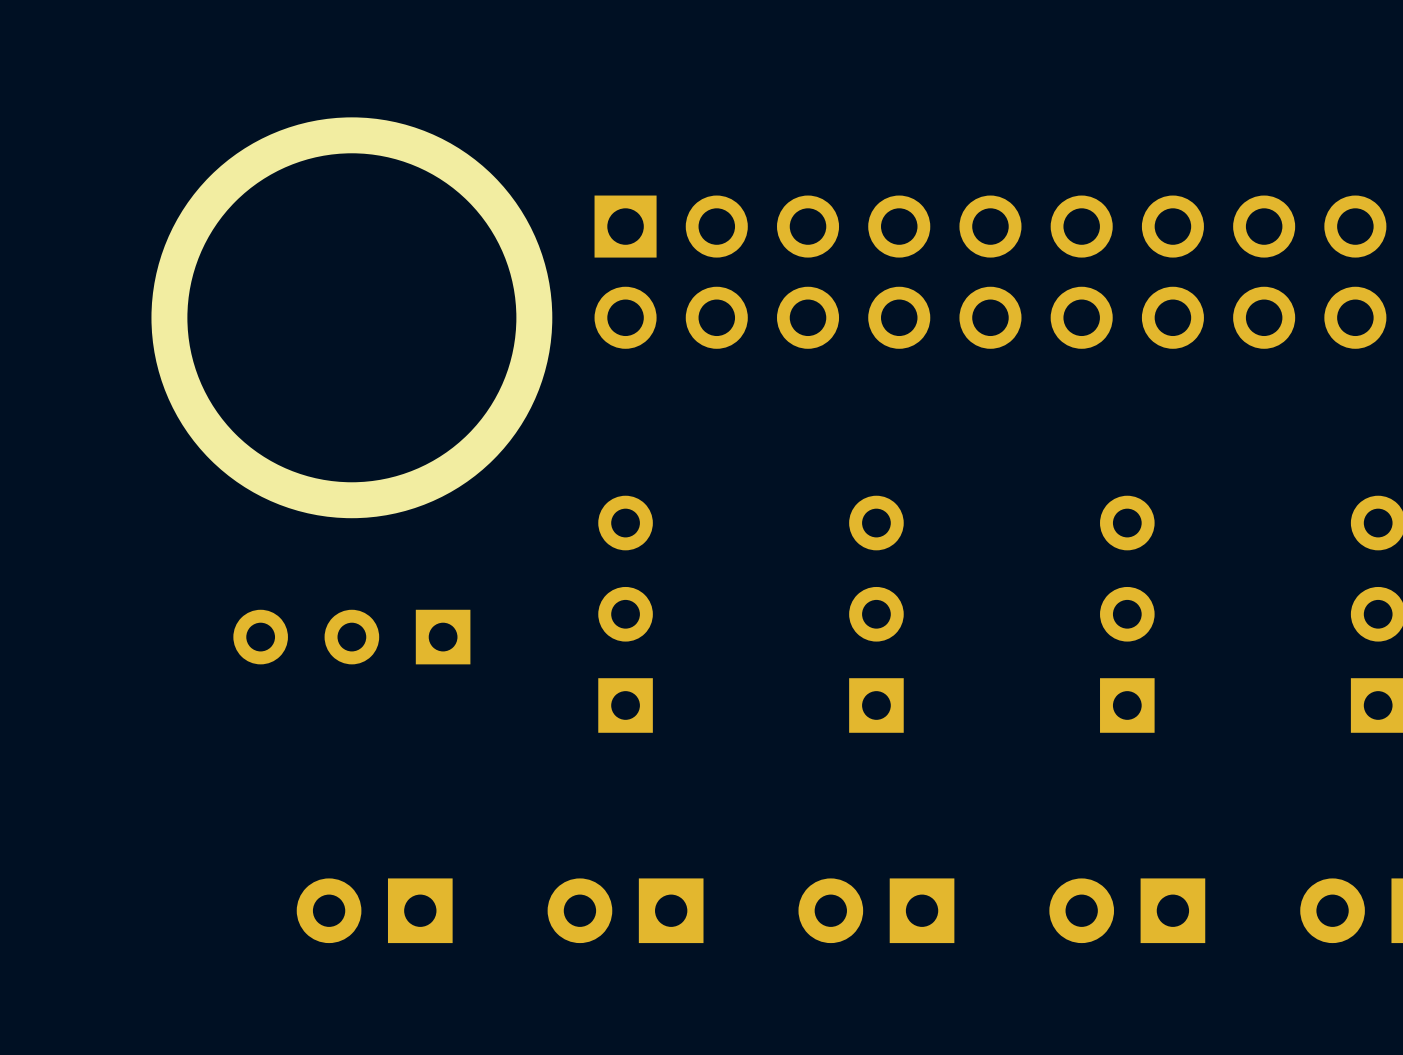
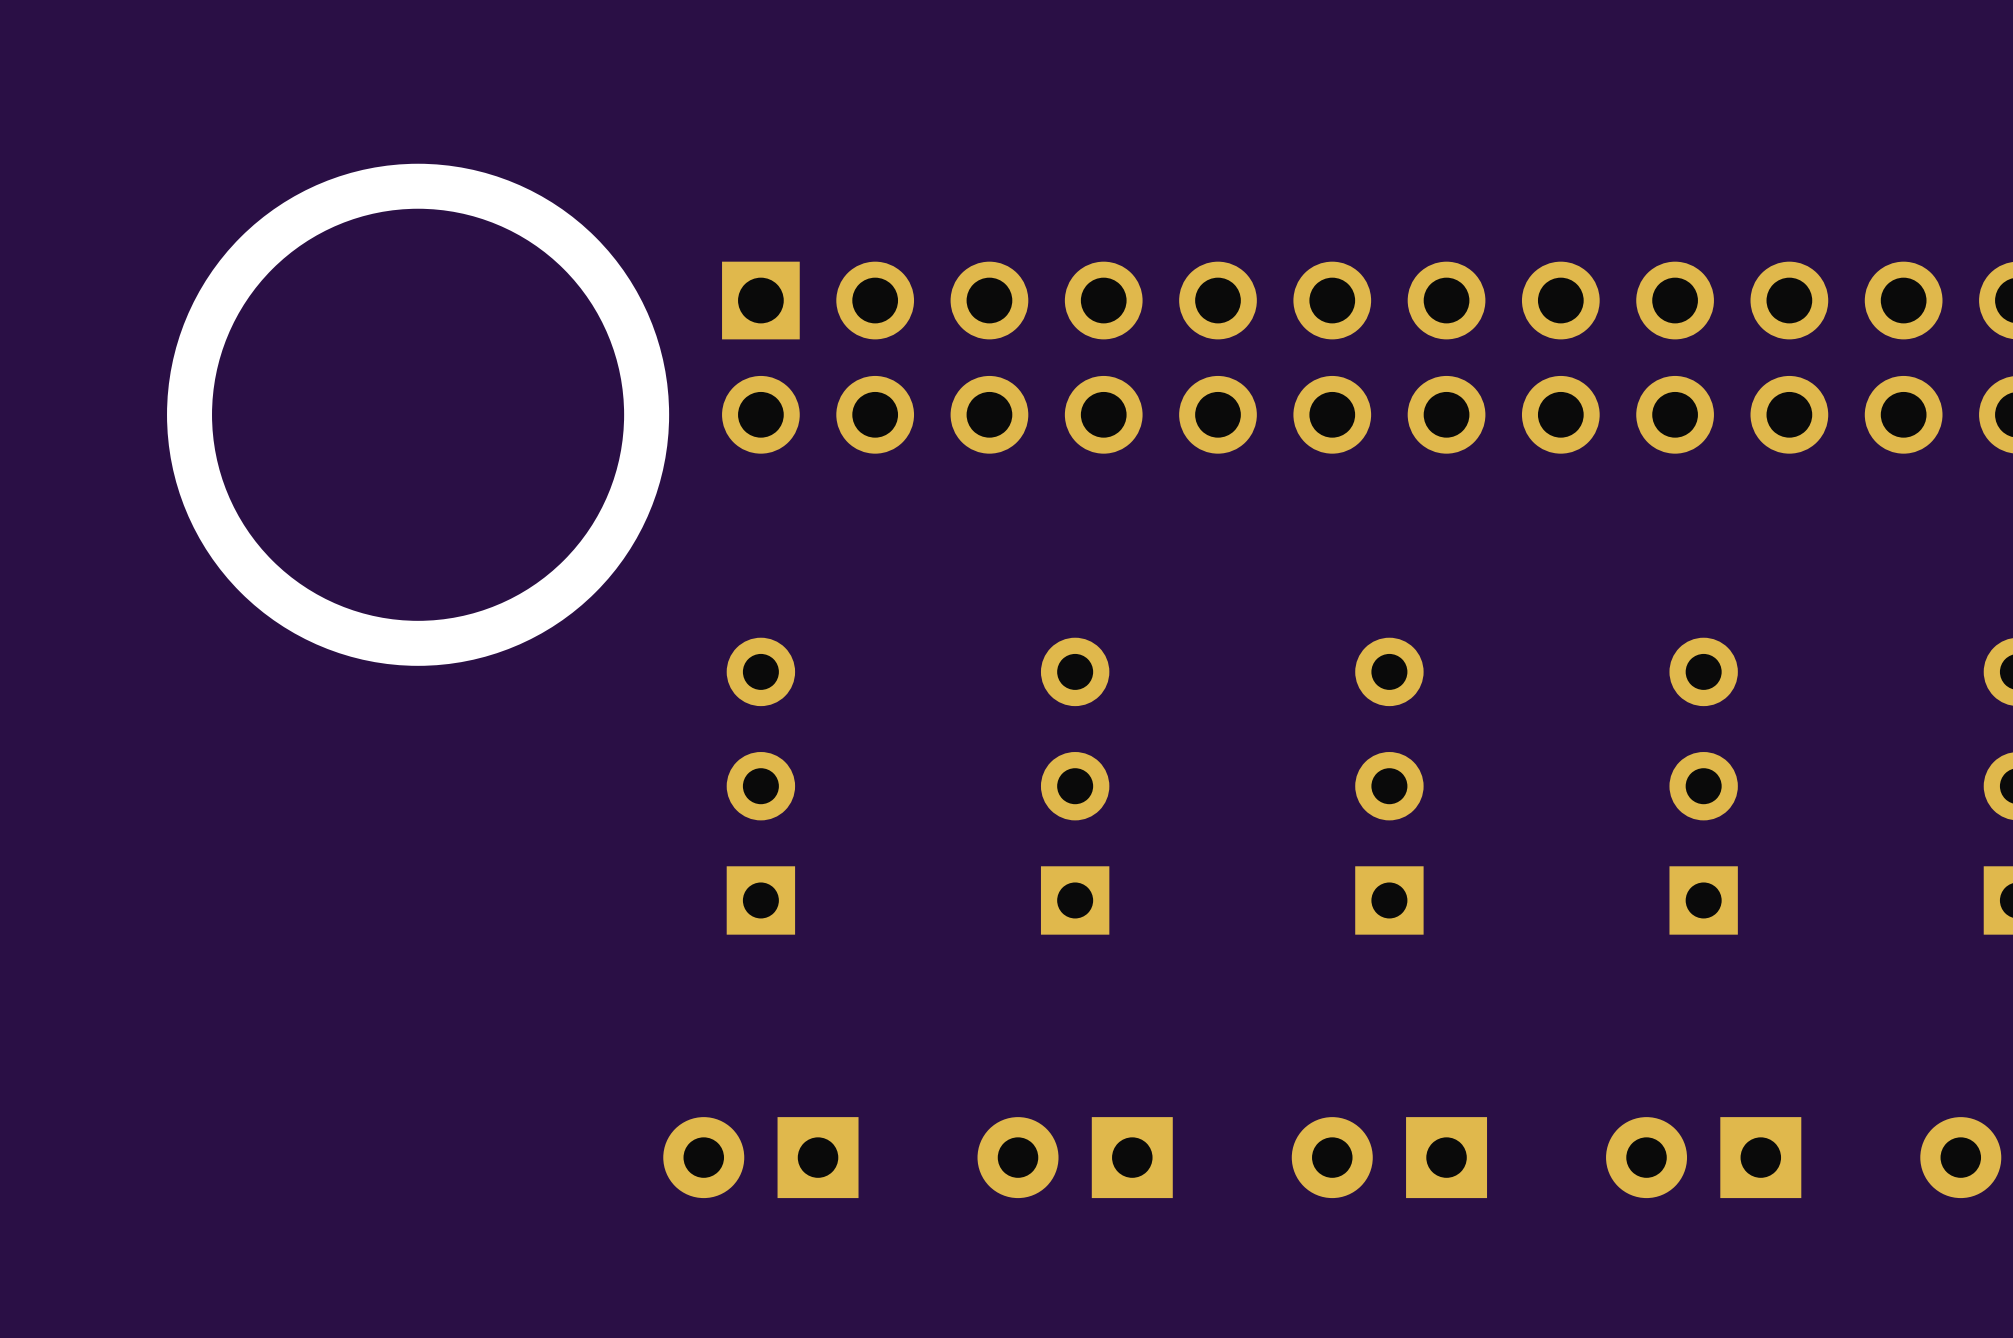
part: (351, 637) -> none
part: (374, 910) -> none

